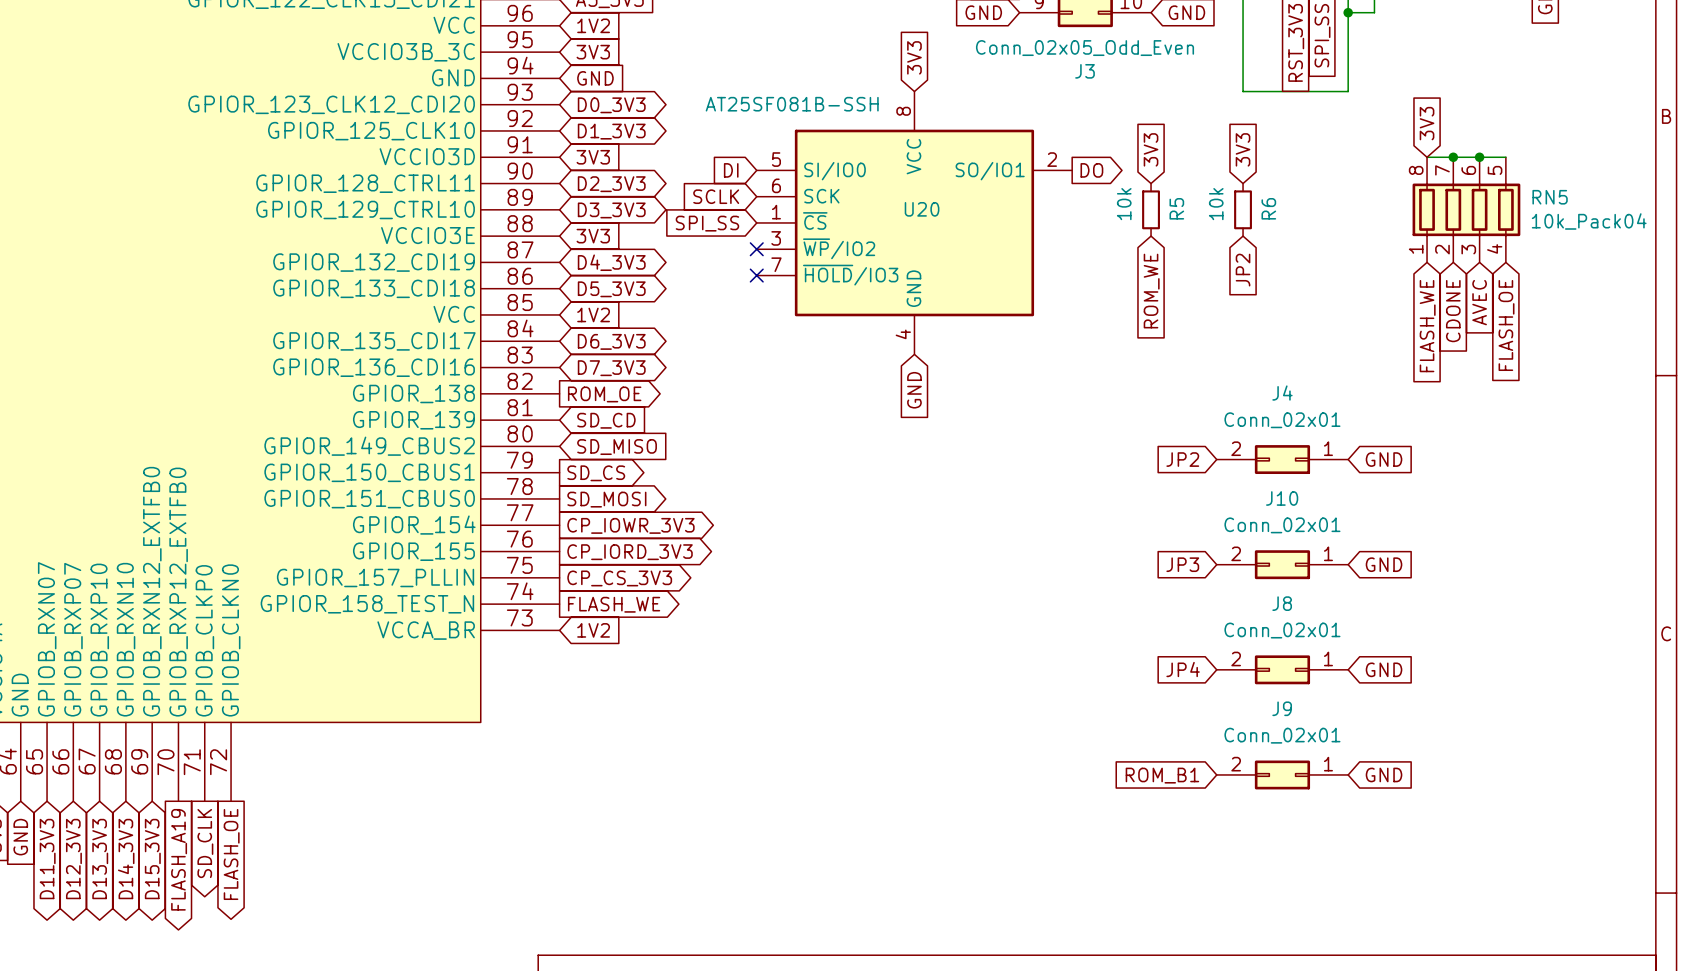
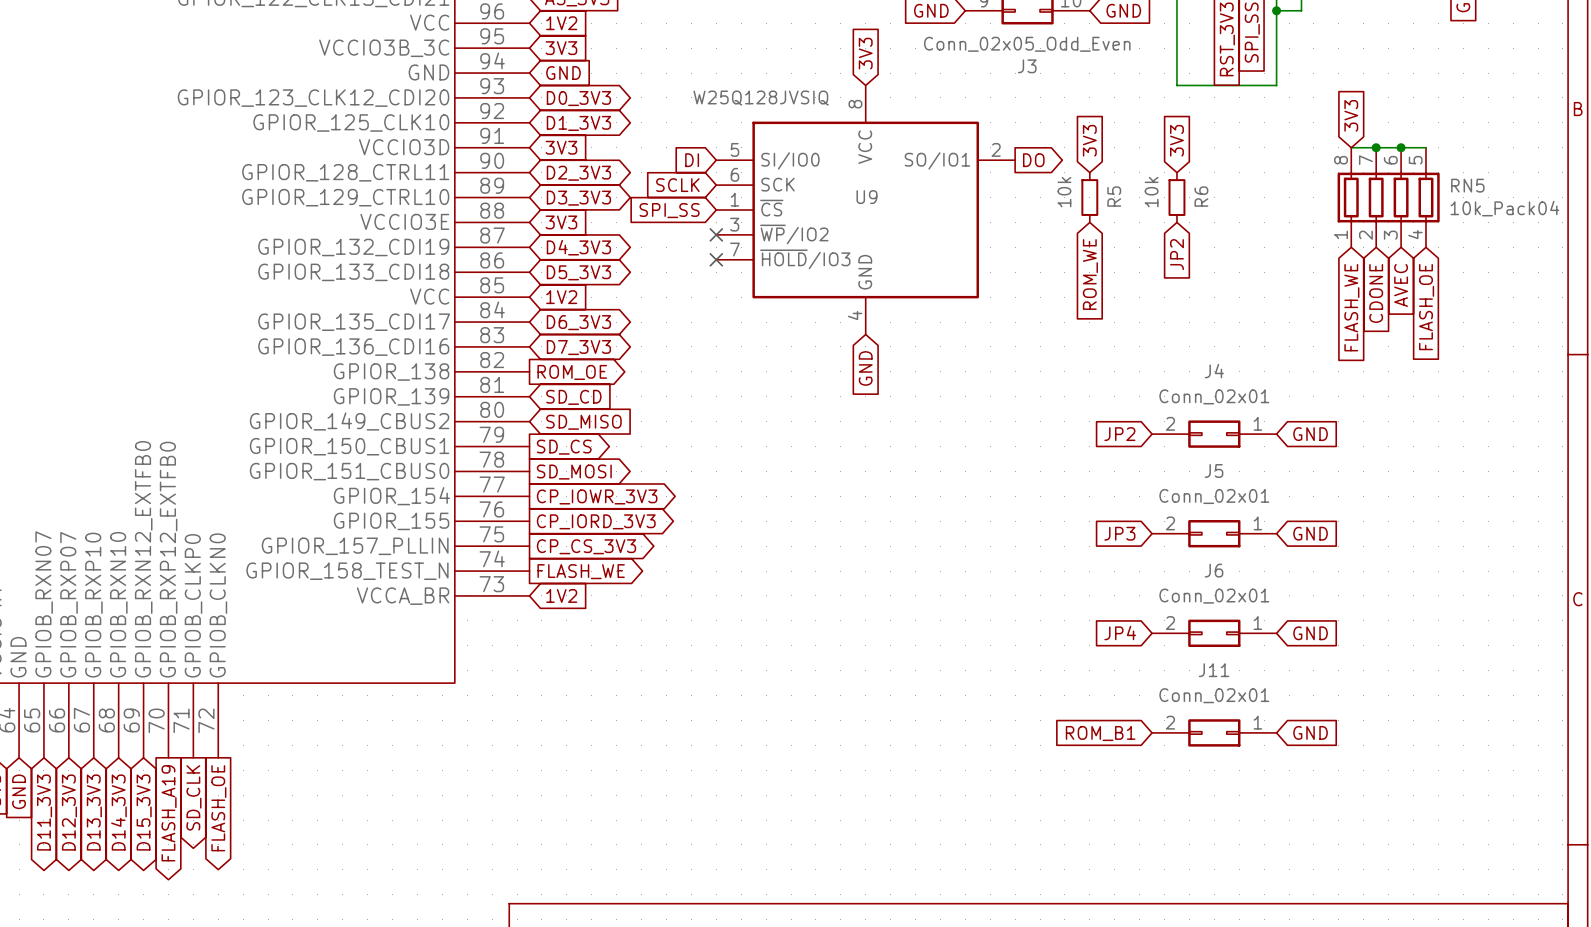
U20 value: AT25SF081B-SSH (792, 104) -> W25Q128JVSIQ (761, 98)
U20 name: U20 (922, 209) -> U9 (866, 197)
J10 name: J10 (1282, 498) -> J5 (1214, 470)
J8 name: J8 (1282, 603) -> J6 (1214, 570)
J9 name: J9 (1282, 708) -> J11 (1214, 670)

